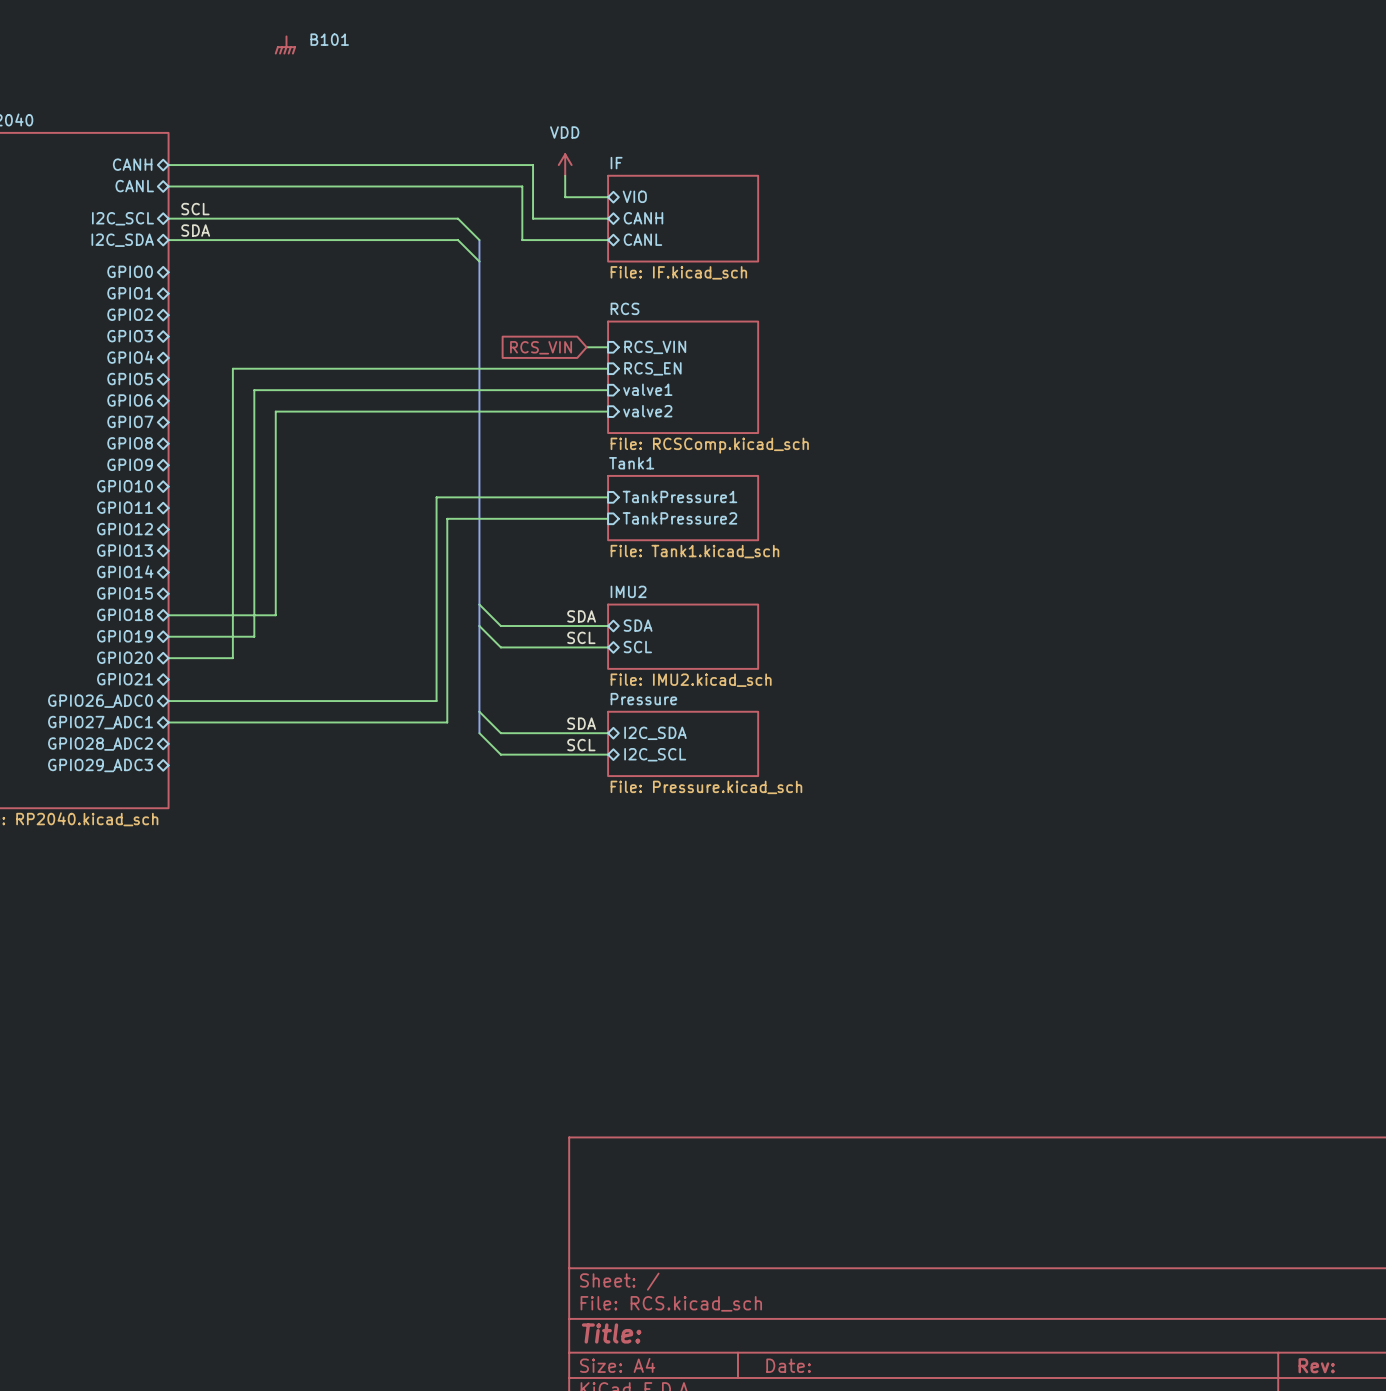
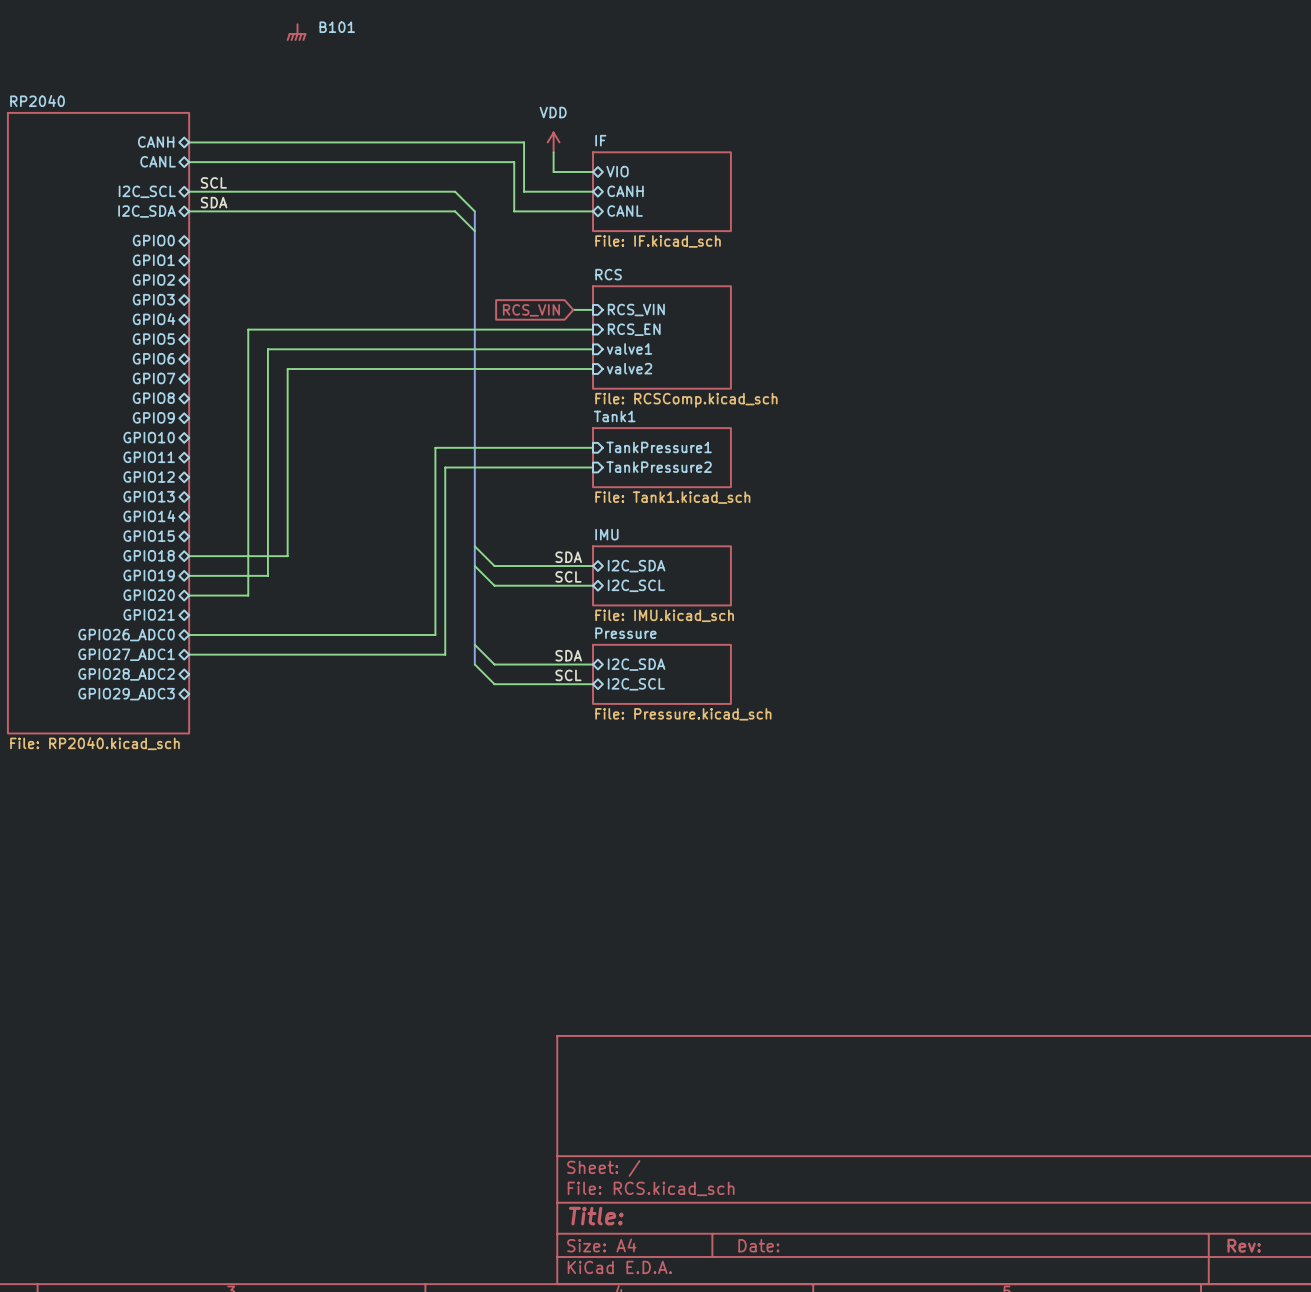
sheet IMU2 name: IMU2 (628, 591) -> IMU (606, 534)
sheet pin: SDA (638, 625) -> I2C_SDA (636, 566)
sheet pin: SCL (637, 647) -> I2C_SCL (636, 585)
sheet IMU2 value: File: IMU2.kicad_sch (691, 680) -> File: IMU.kicad_sch (664, 615)

